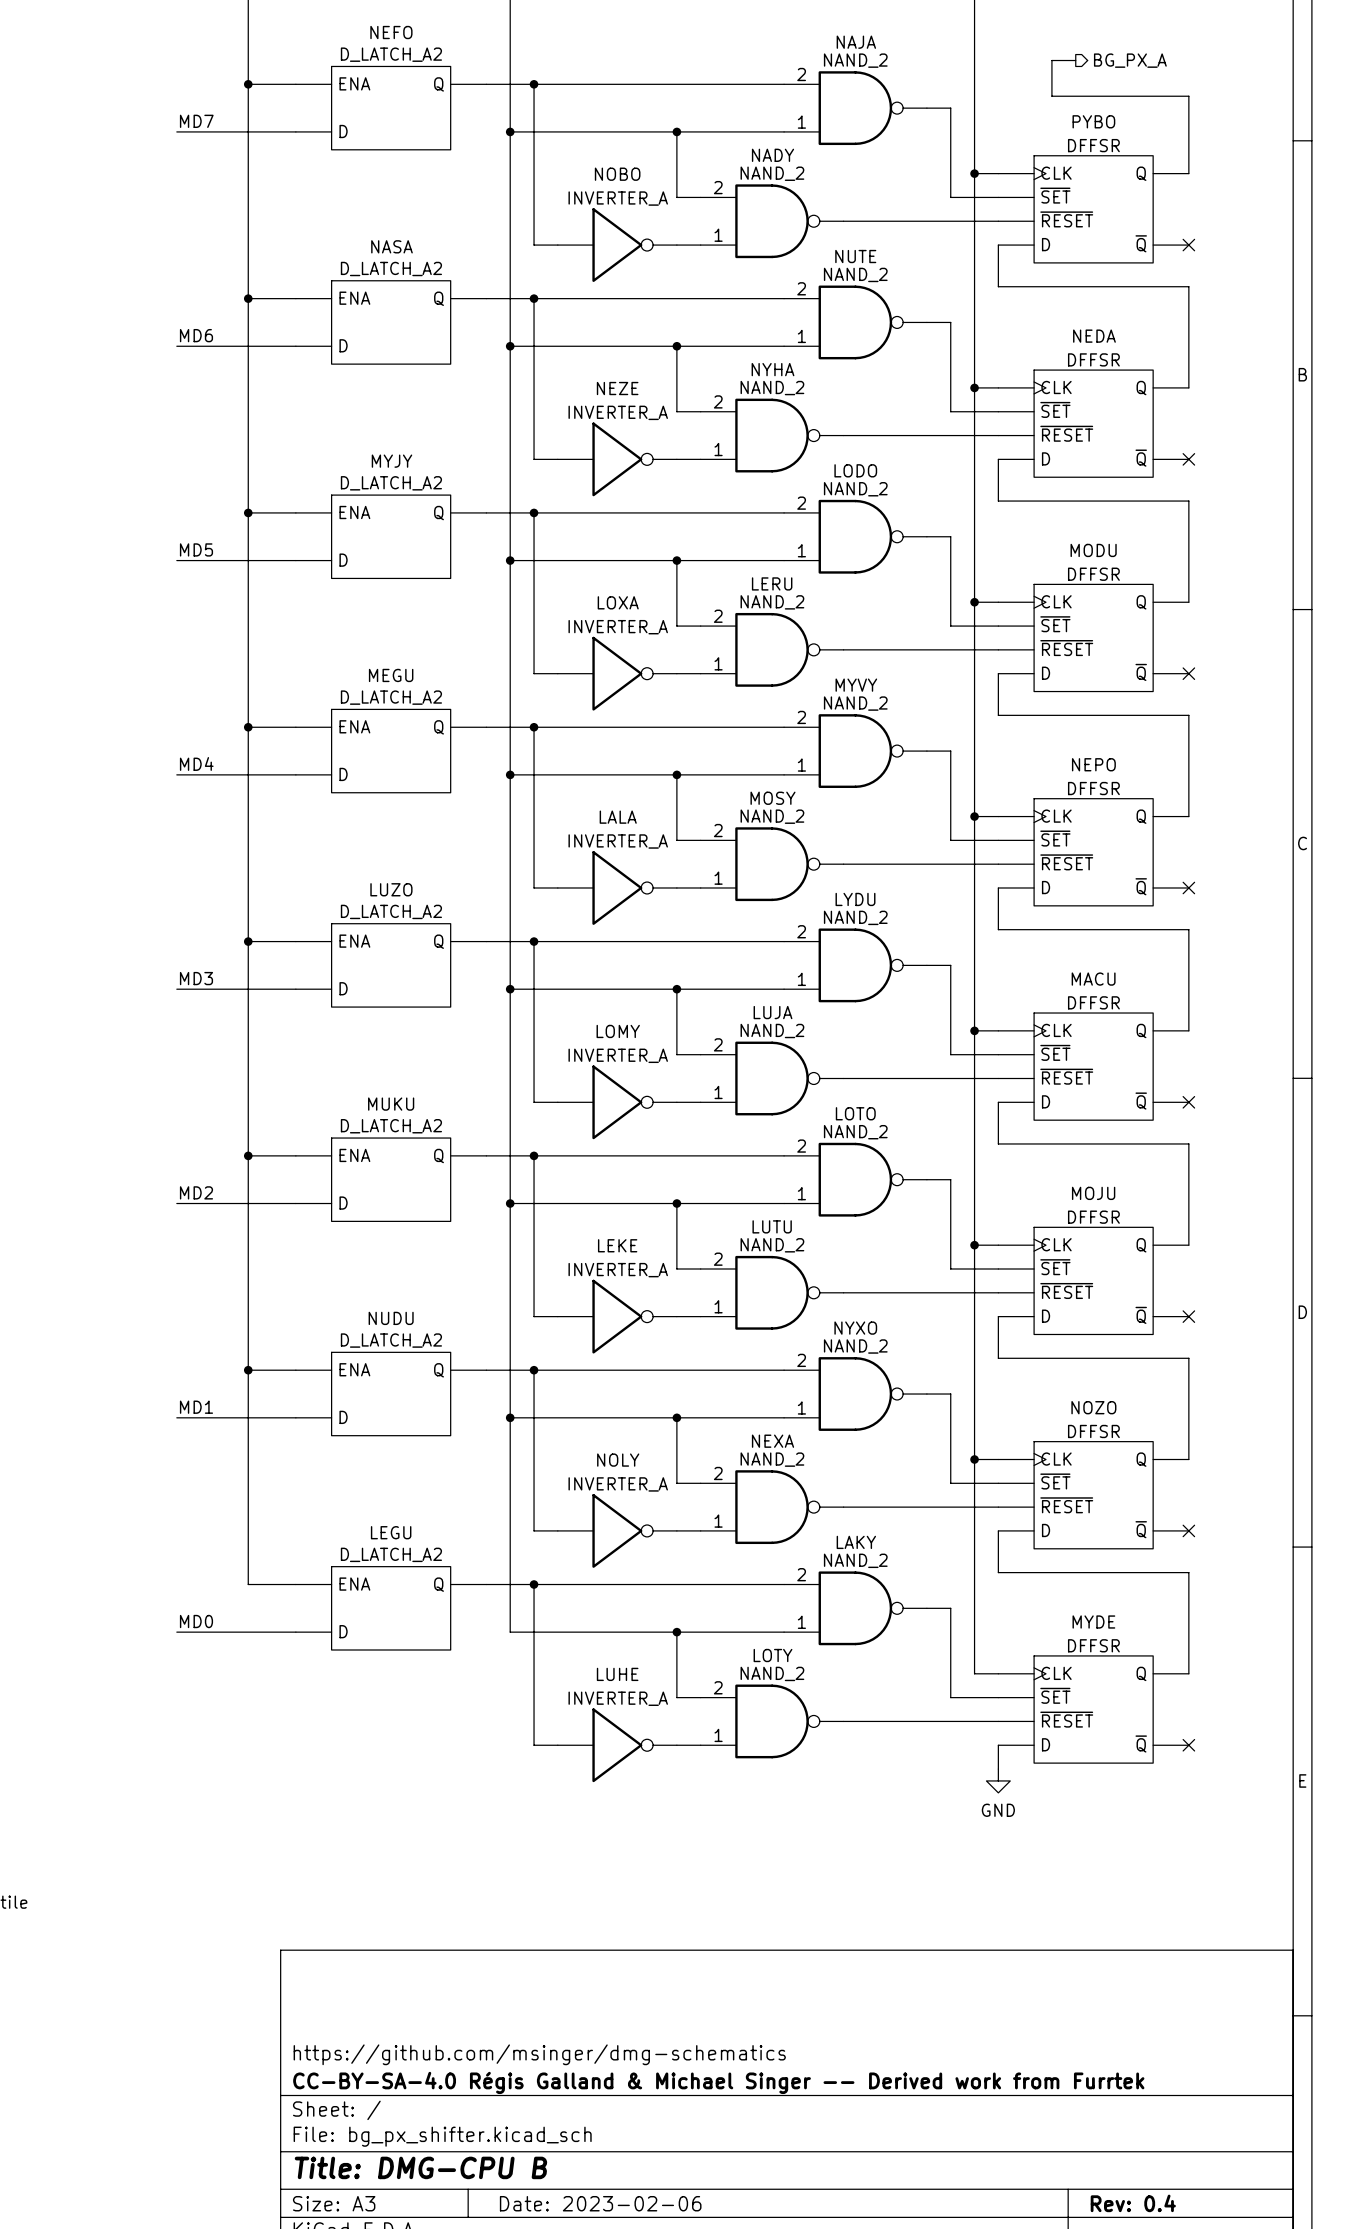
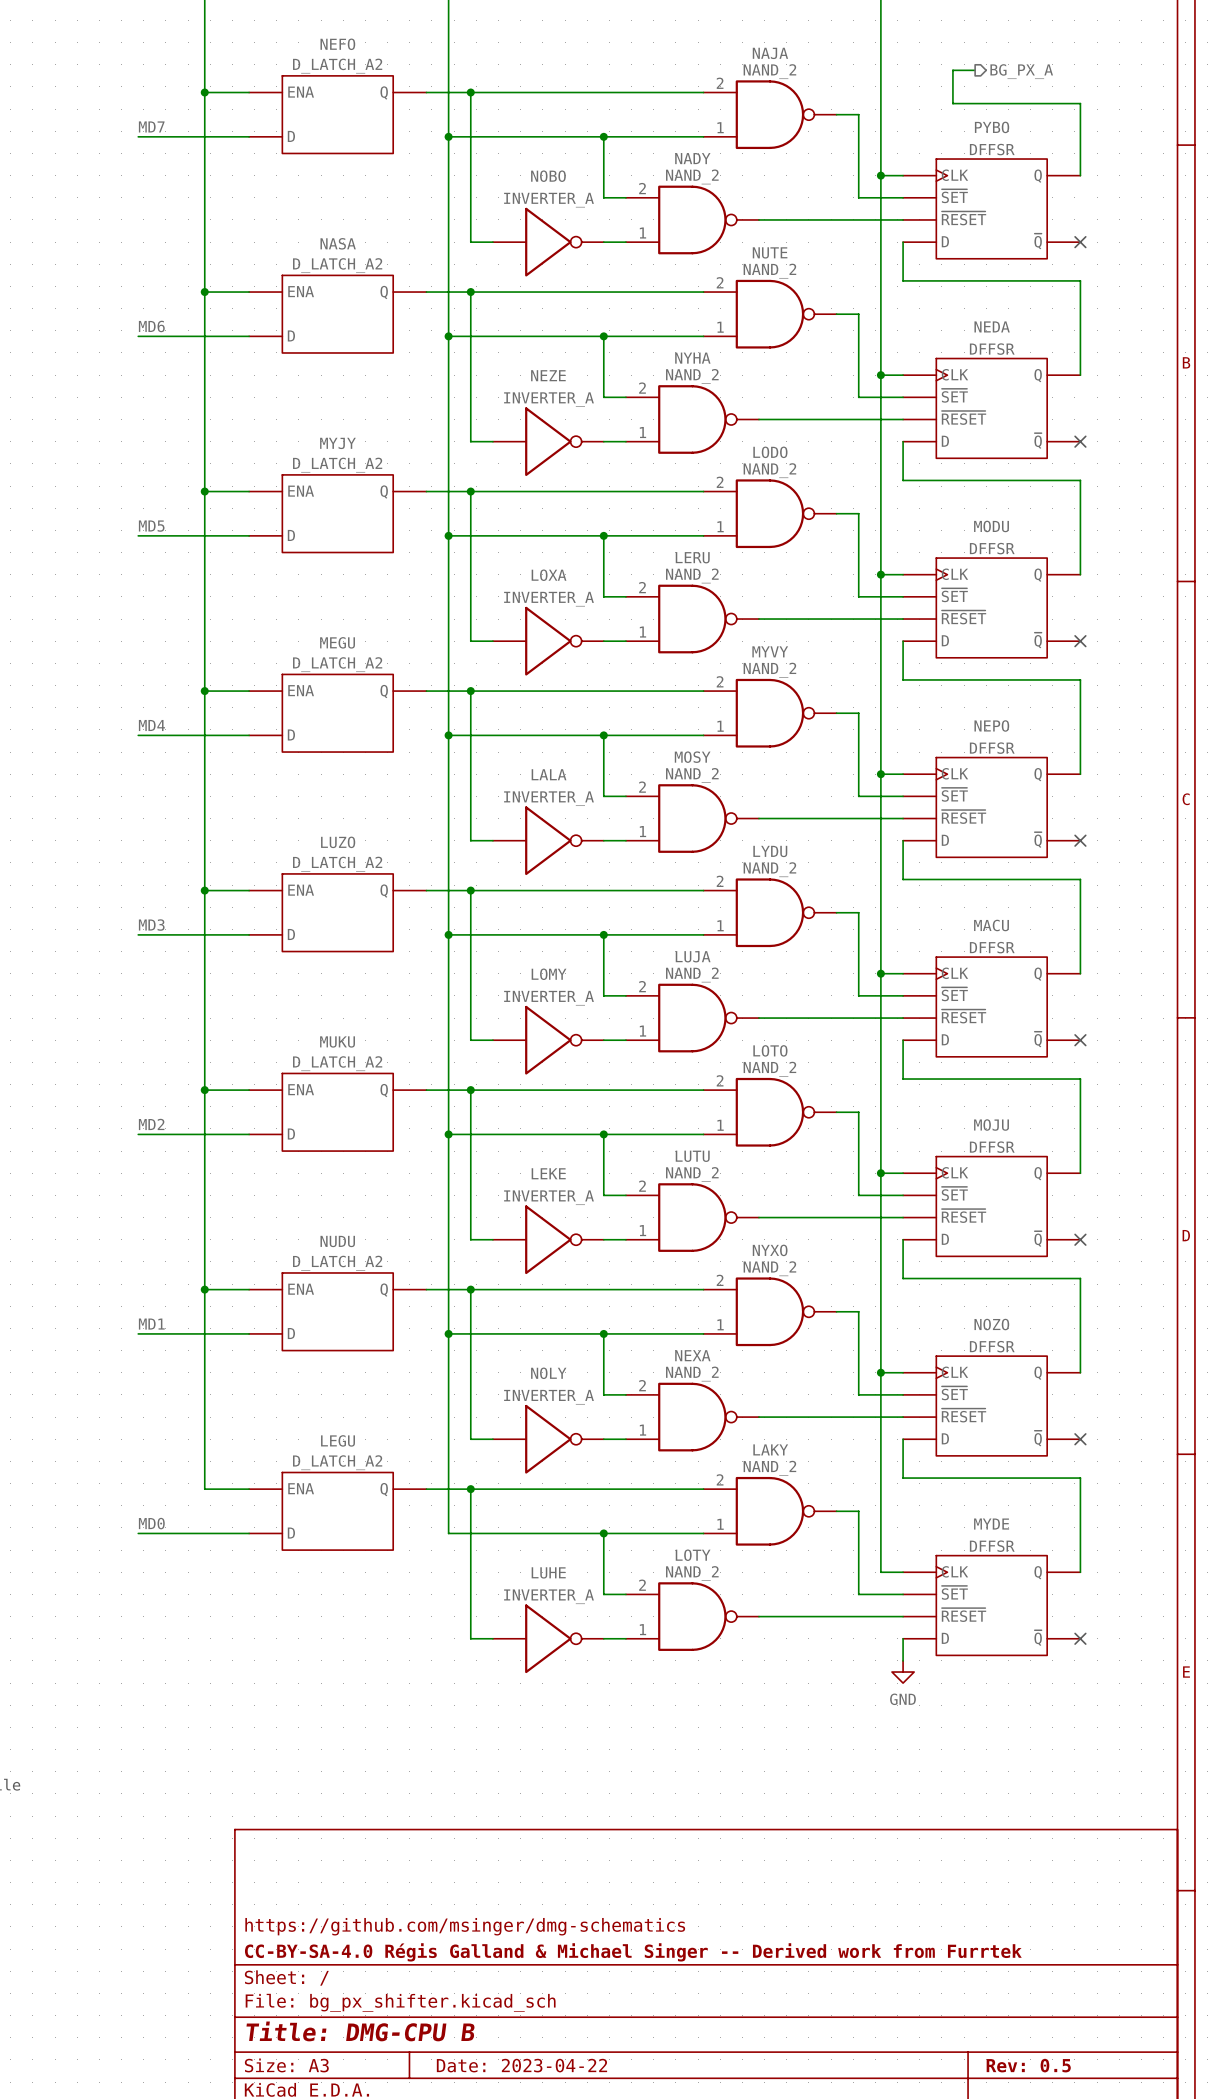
title block: Date: 2023-02-06 (600, 2203) -> Date: 2023-04-22 (521, 2065)
title block: Rev: 0.4 (1133, 2203) -> Rev: 0.5 (1028, 2065)

